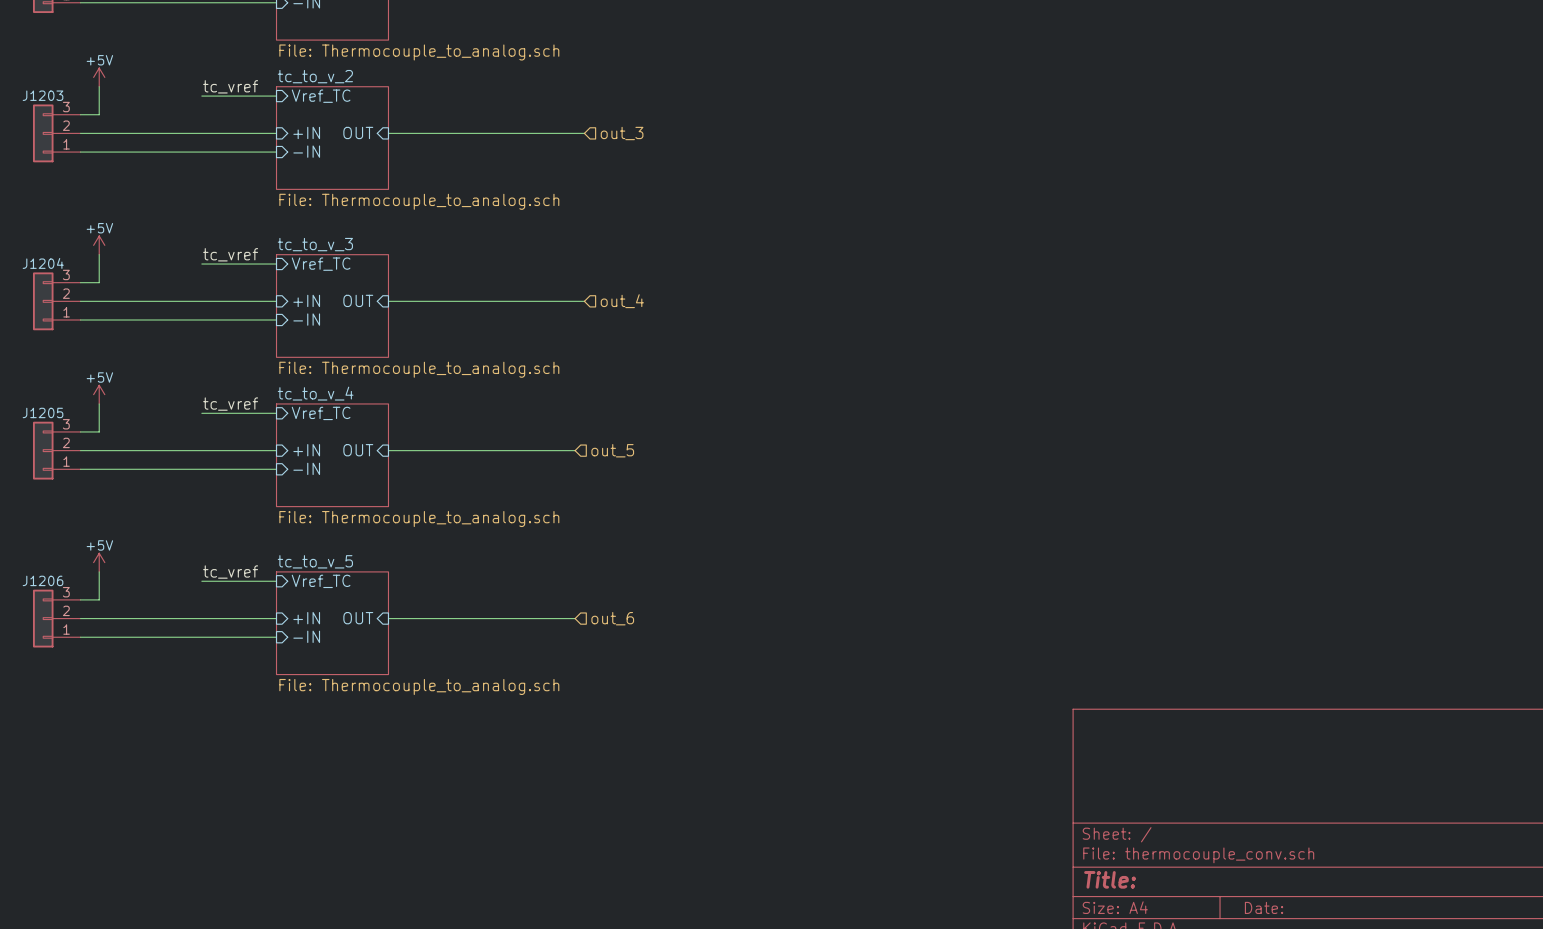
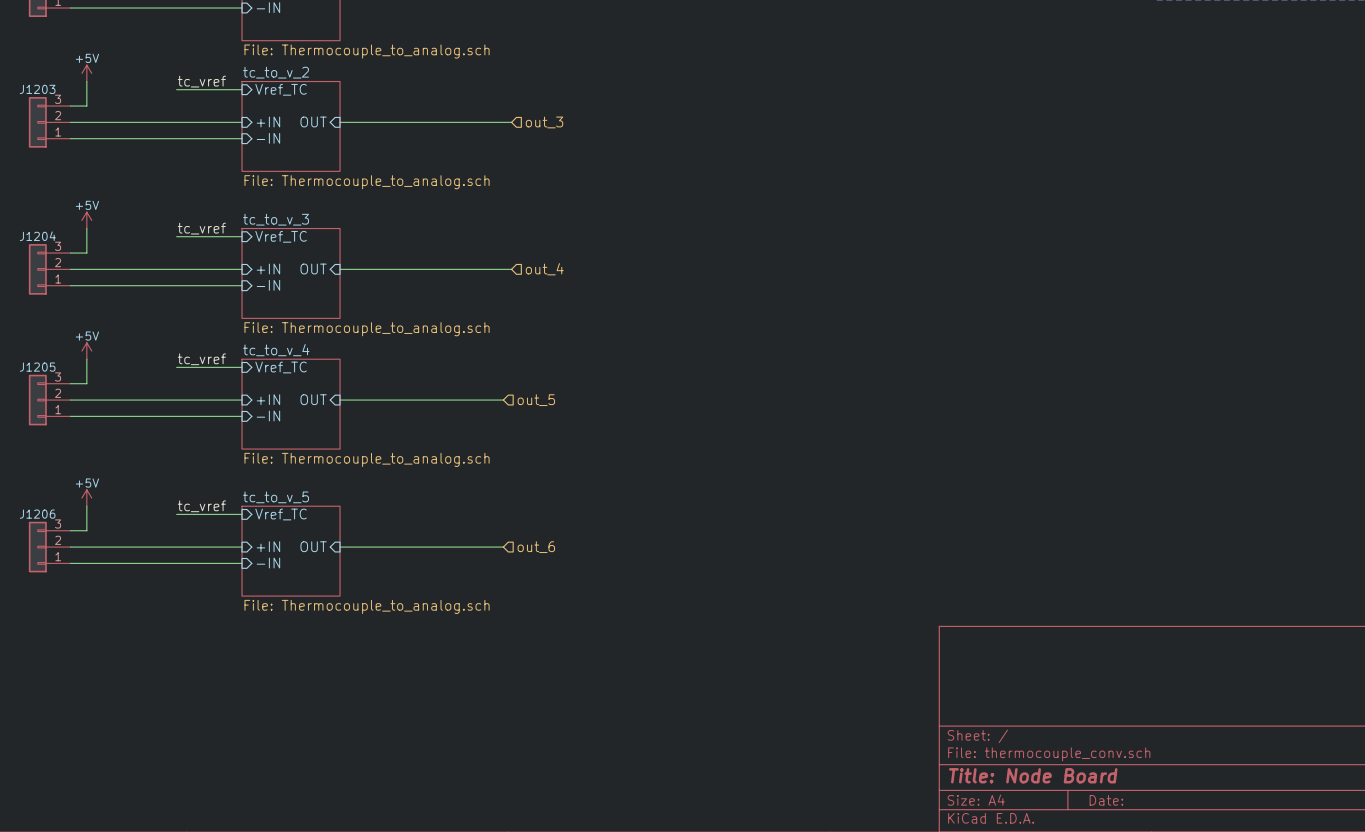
title block: Title: (1110, 879) -> Title: Node Board (1033, 775)

